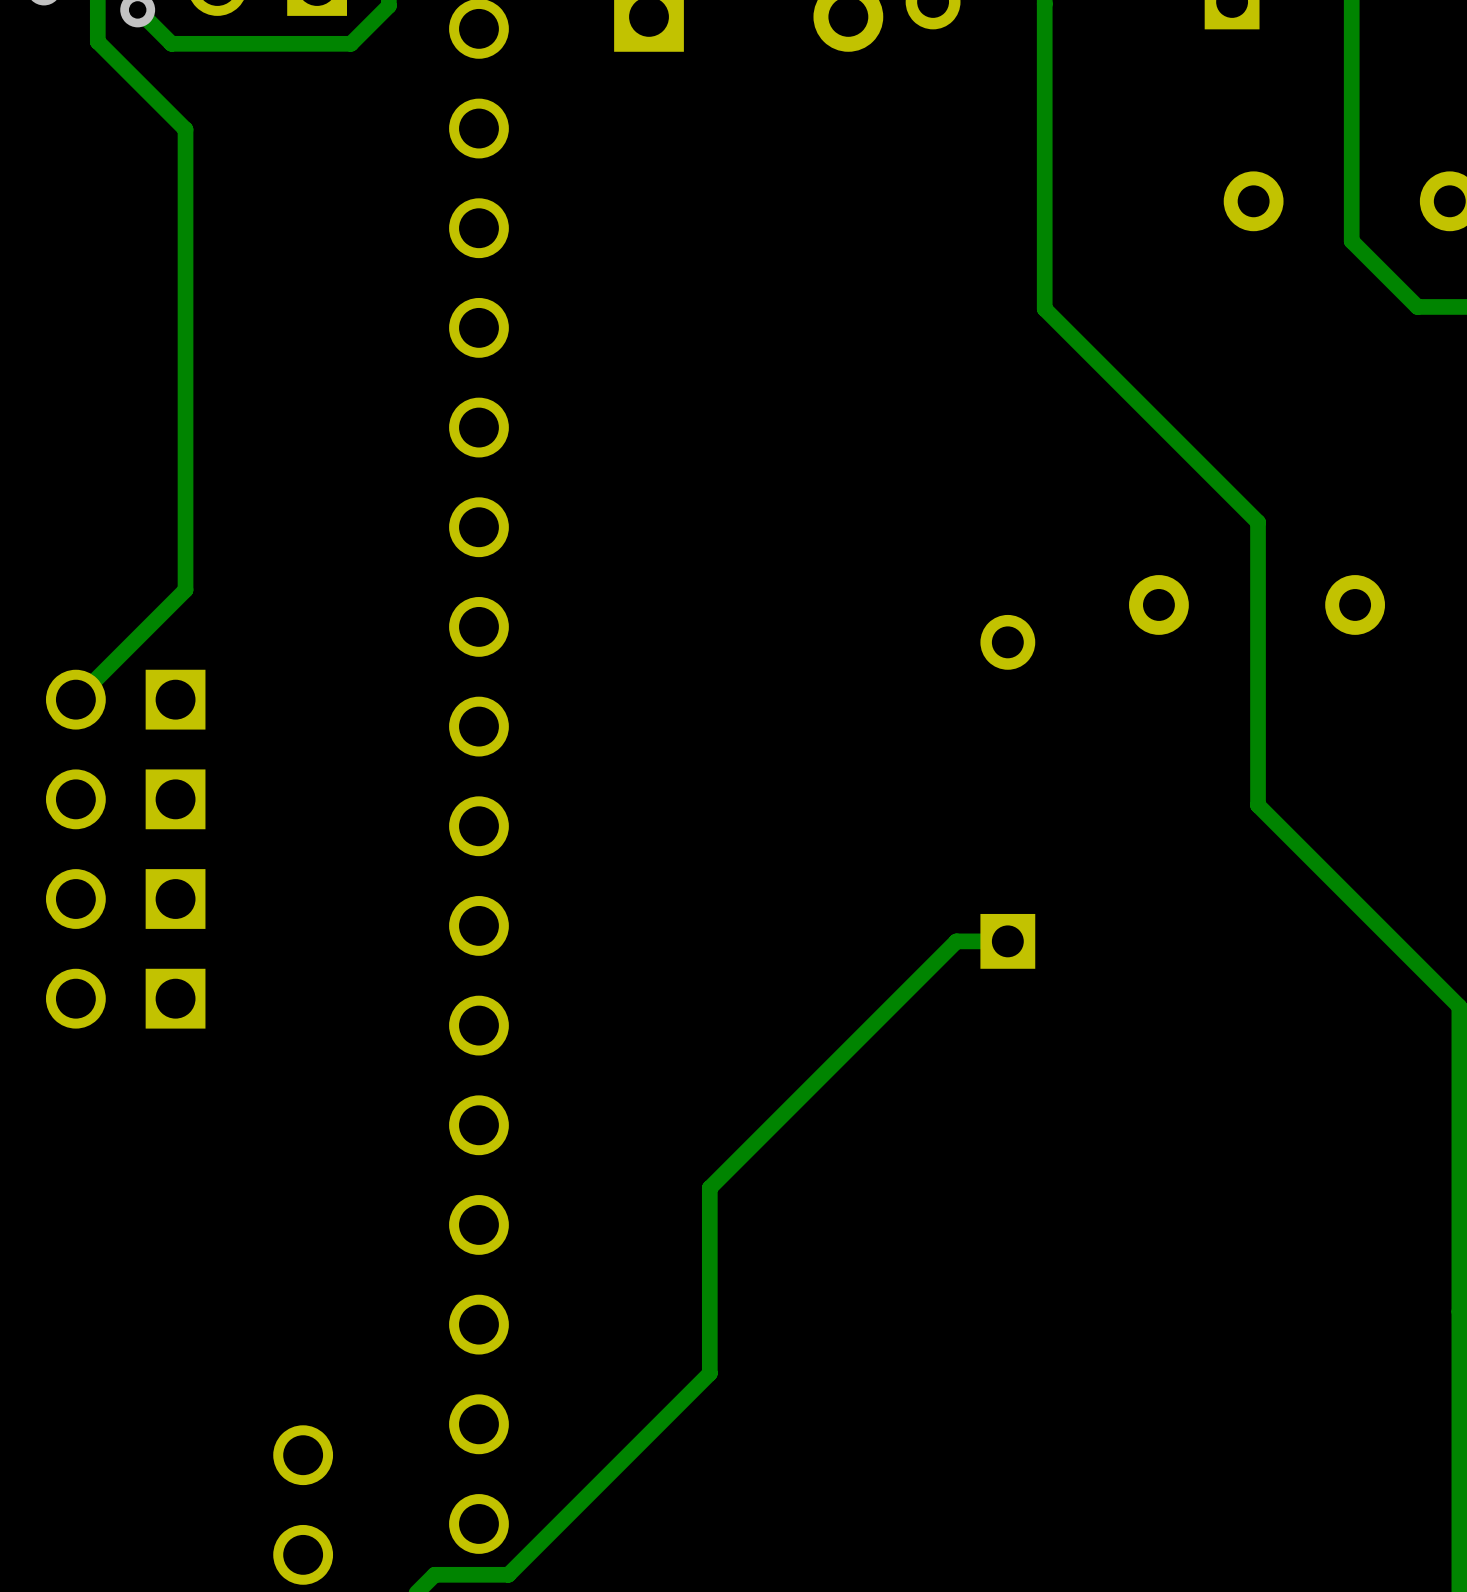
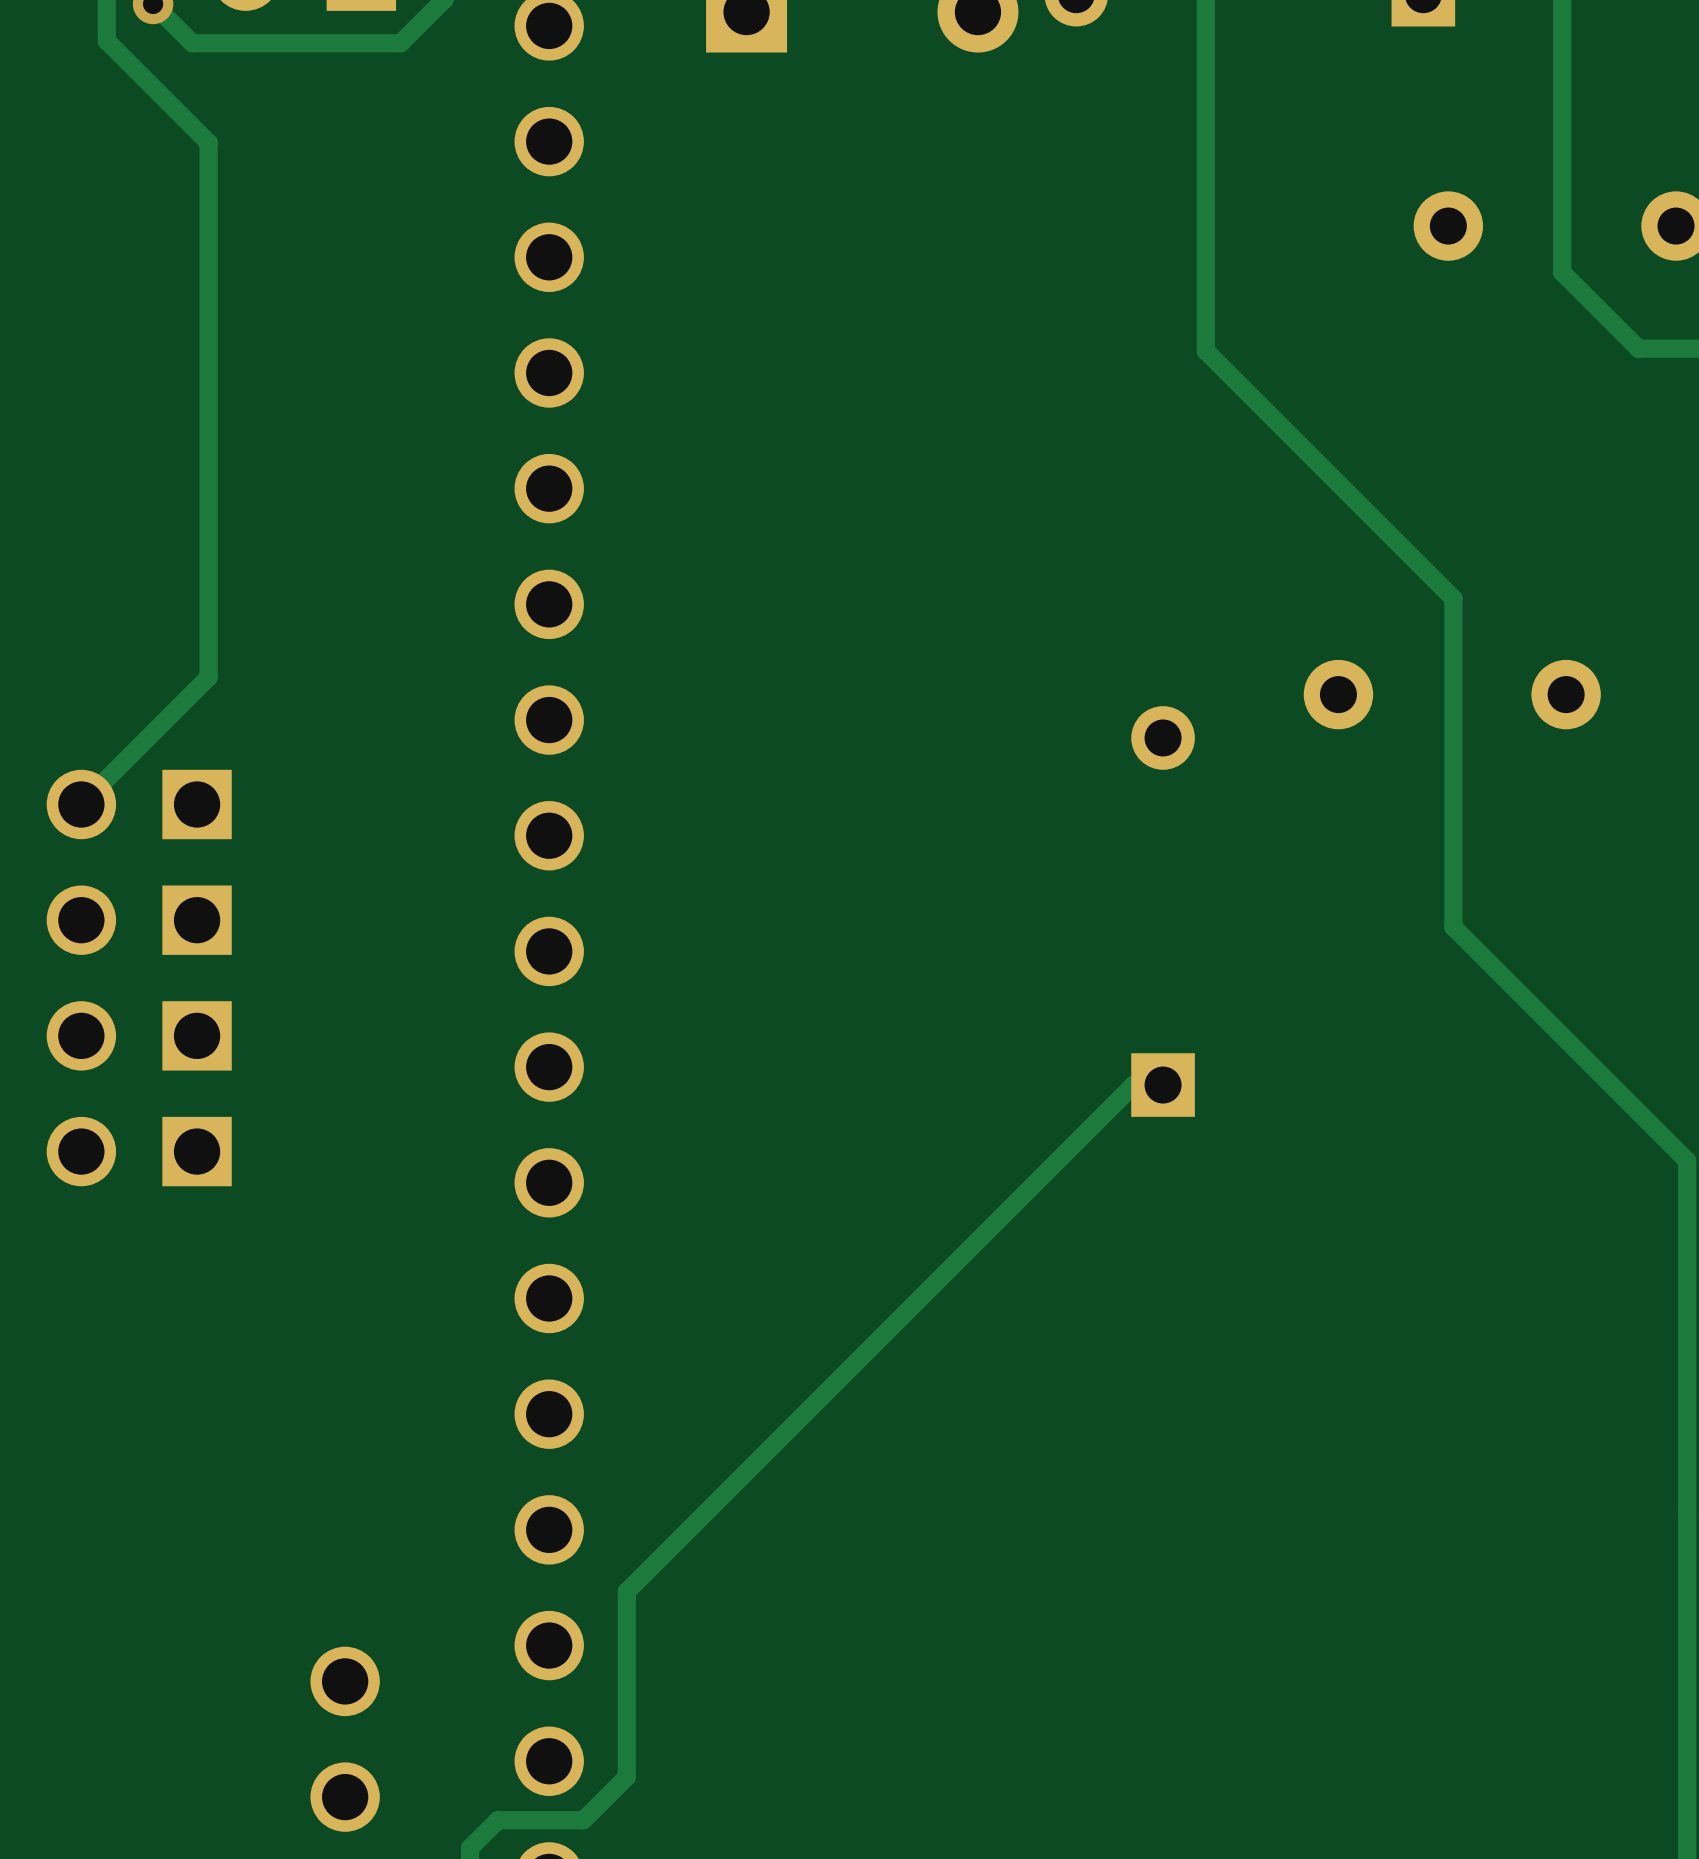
track: (982, 941) (956, 941) (709, 1188) (709, 1373) (545, 1537) -> (1133, 1085) (626, 1591) (626, 1776)

